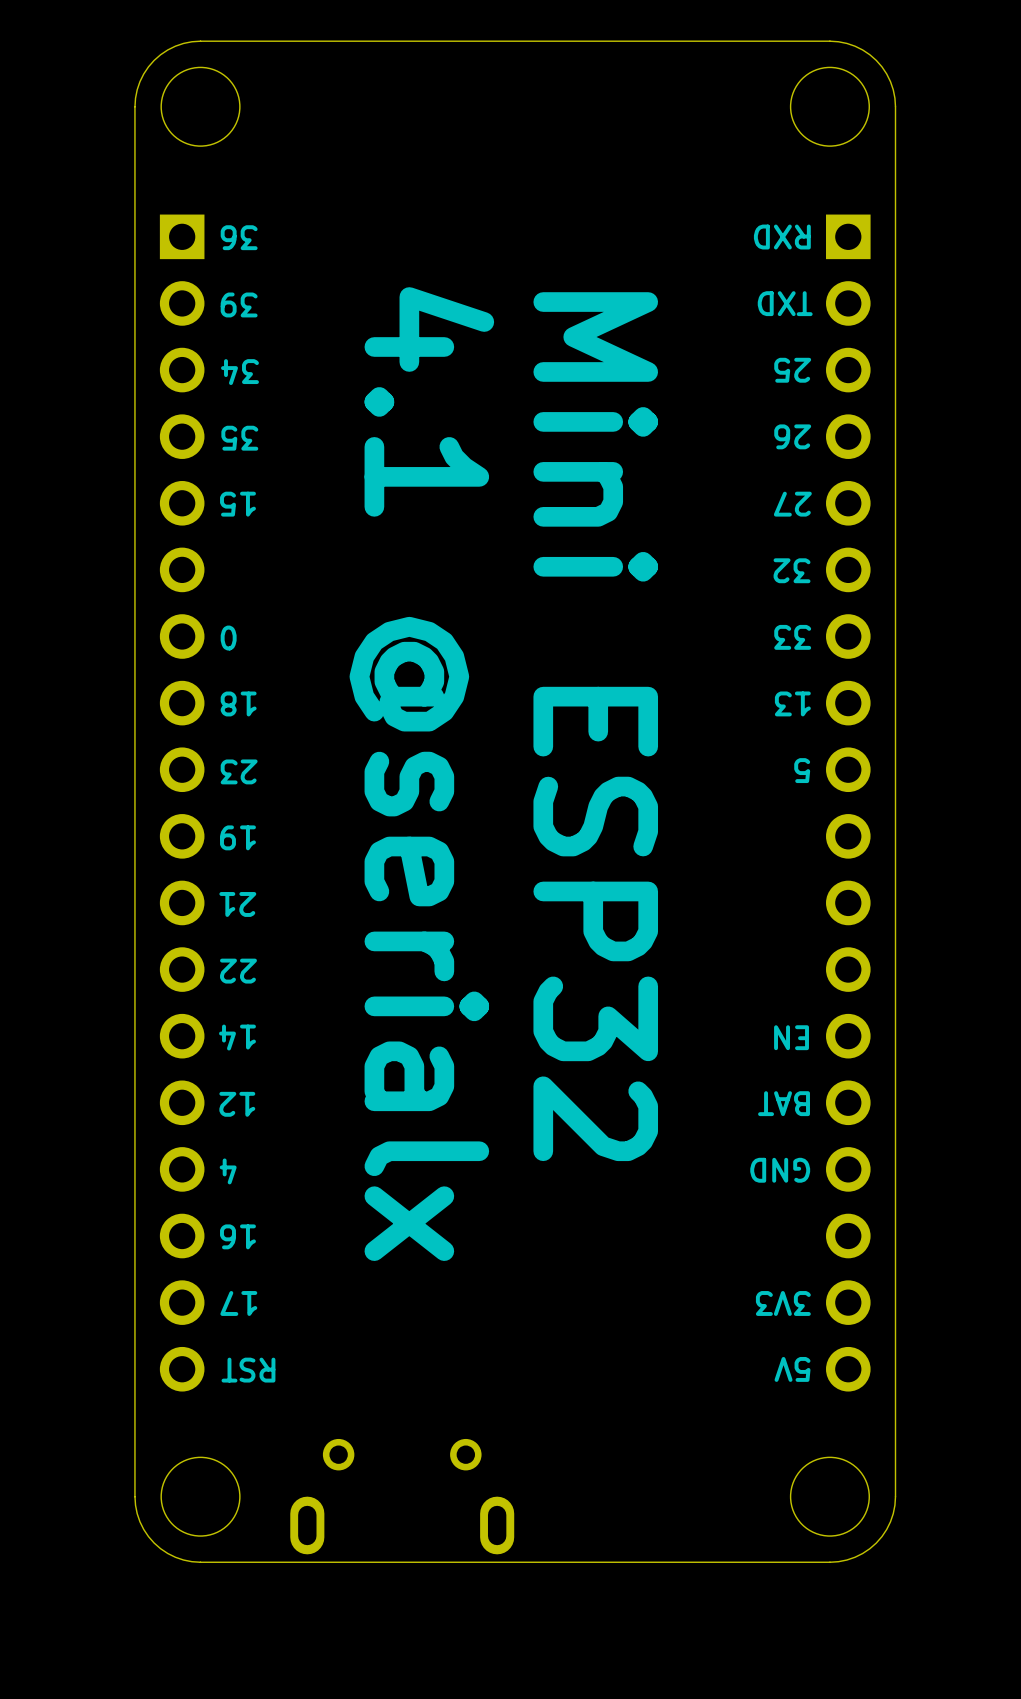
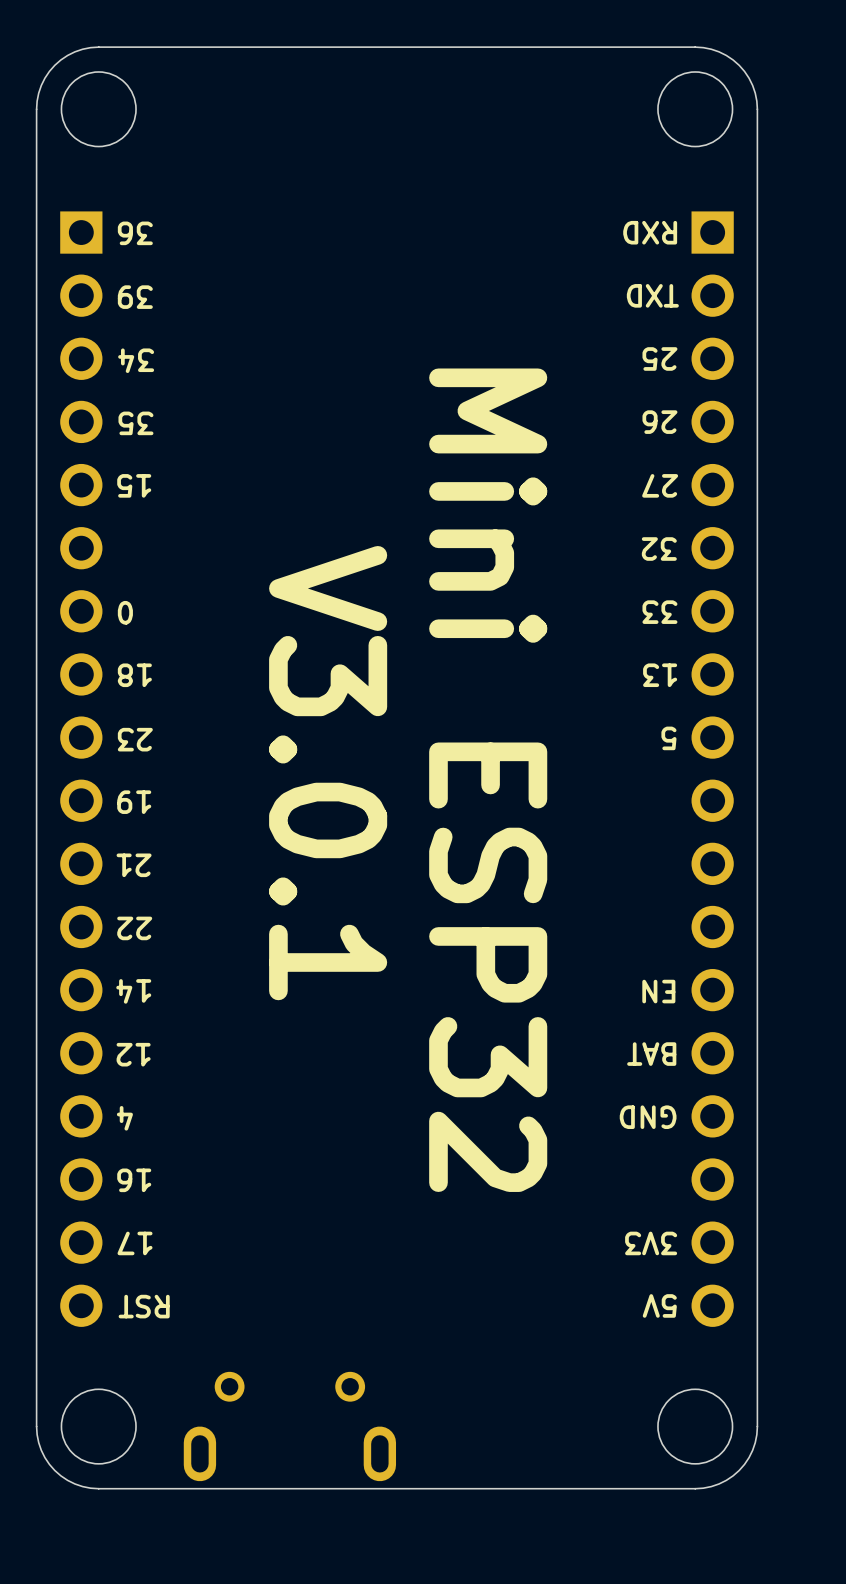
text position: Mini ESP32 (595, 726) -> Mini ESP32 (488, 780)
text: 4.1 @serialx (421, 774) -> none
text: none -> V3.0.1 (328, 773)

